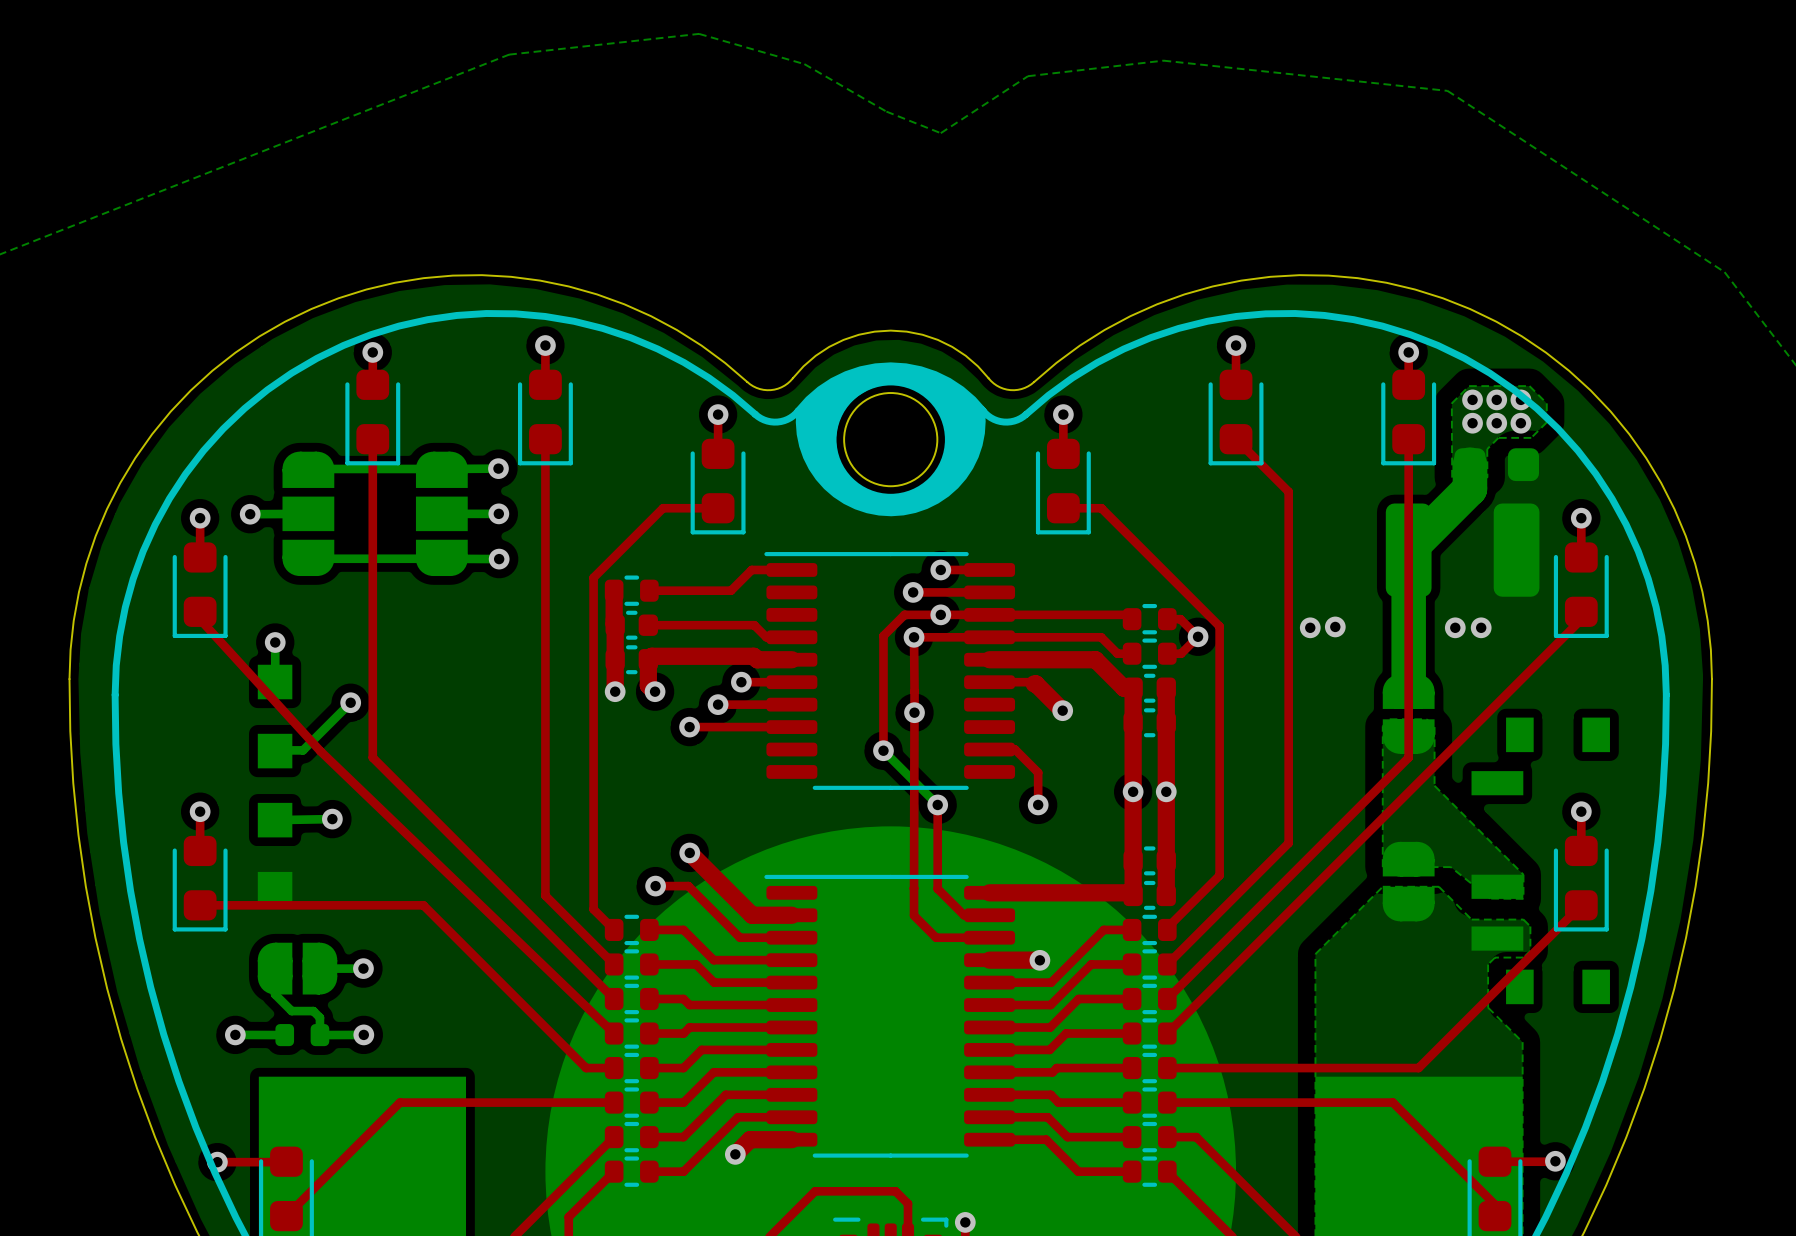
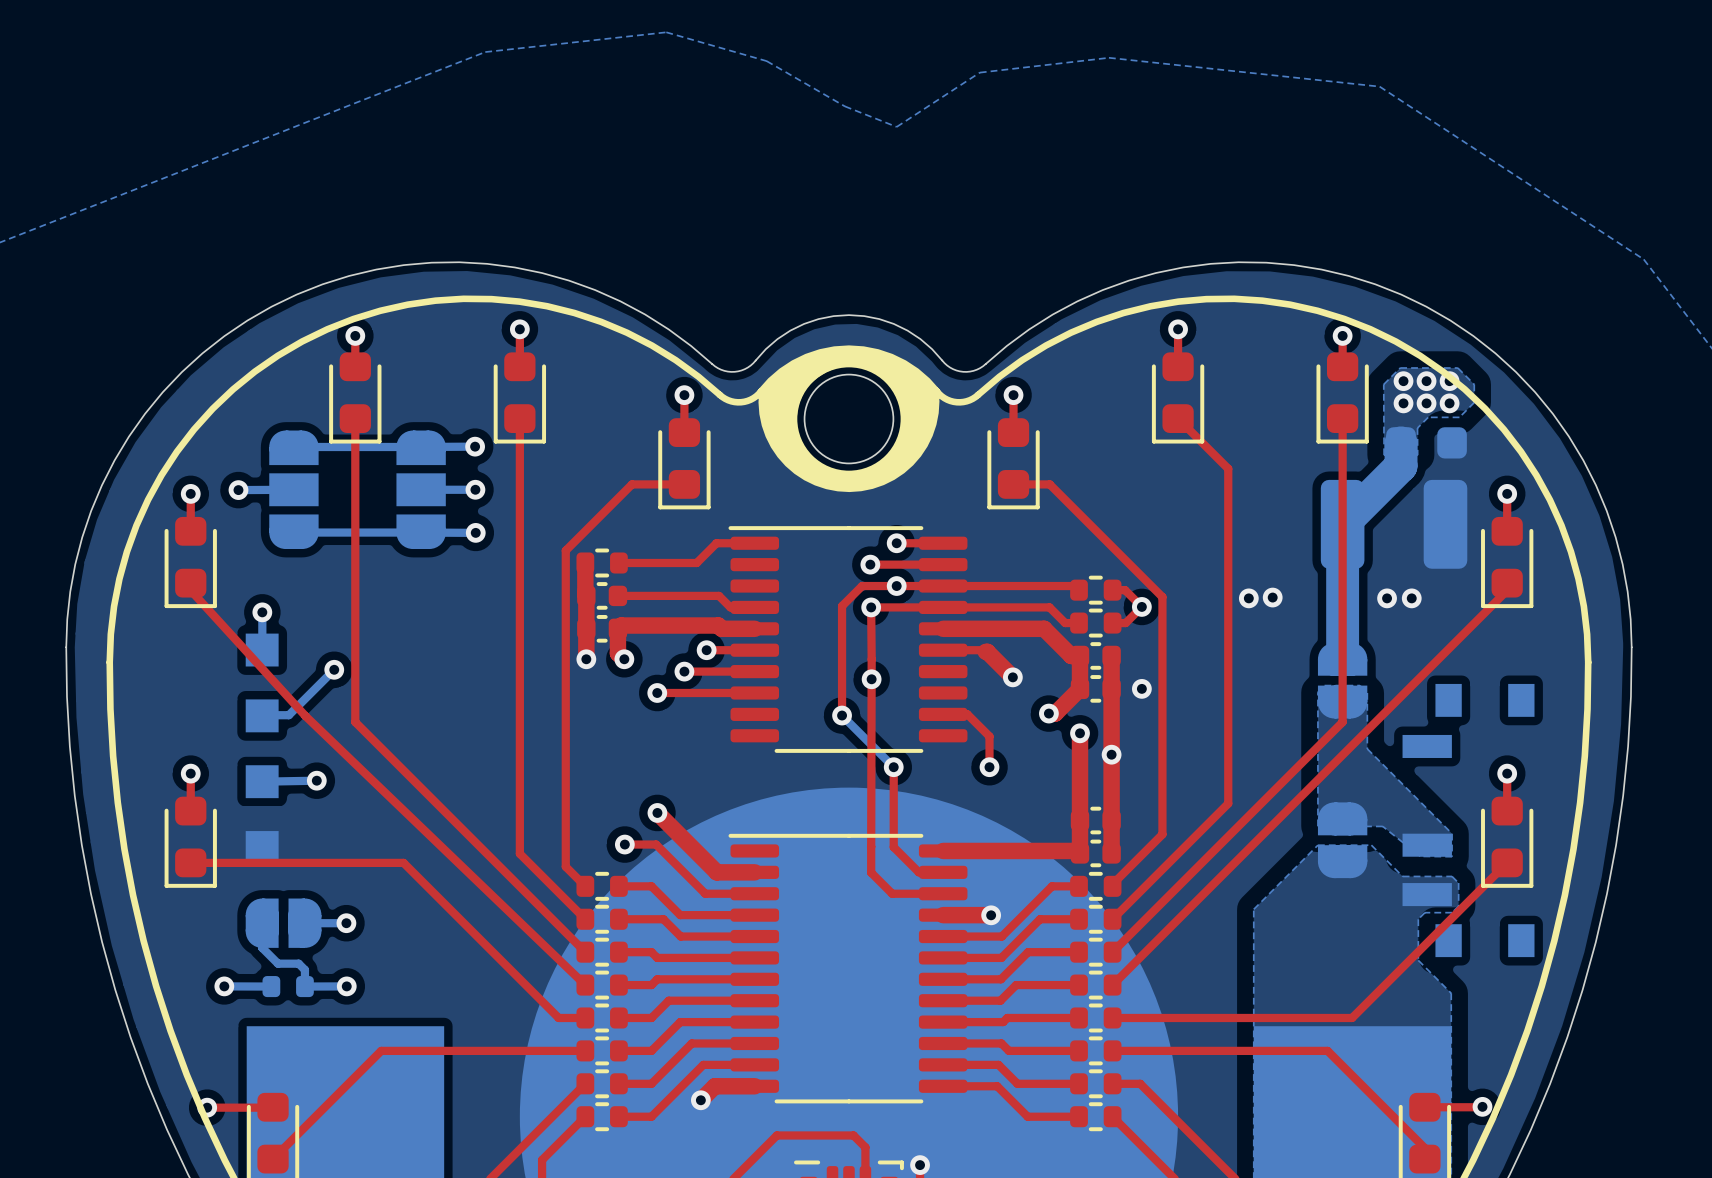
top track: (1133, 722) (1133, 769) -> (1080, 688) (1055, 713) (1048, 713)
via: none -> (1141, 688)
via: none -> (1048, 713)
via position: (1133, 791) -> (1080, 733)

